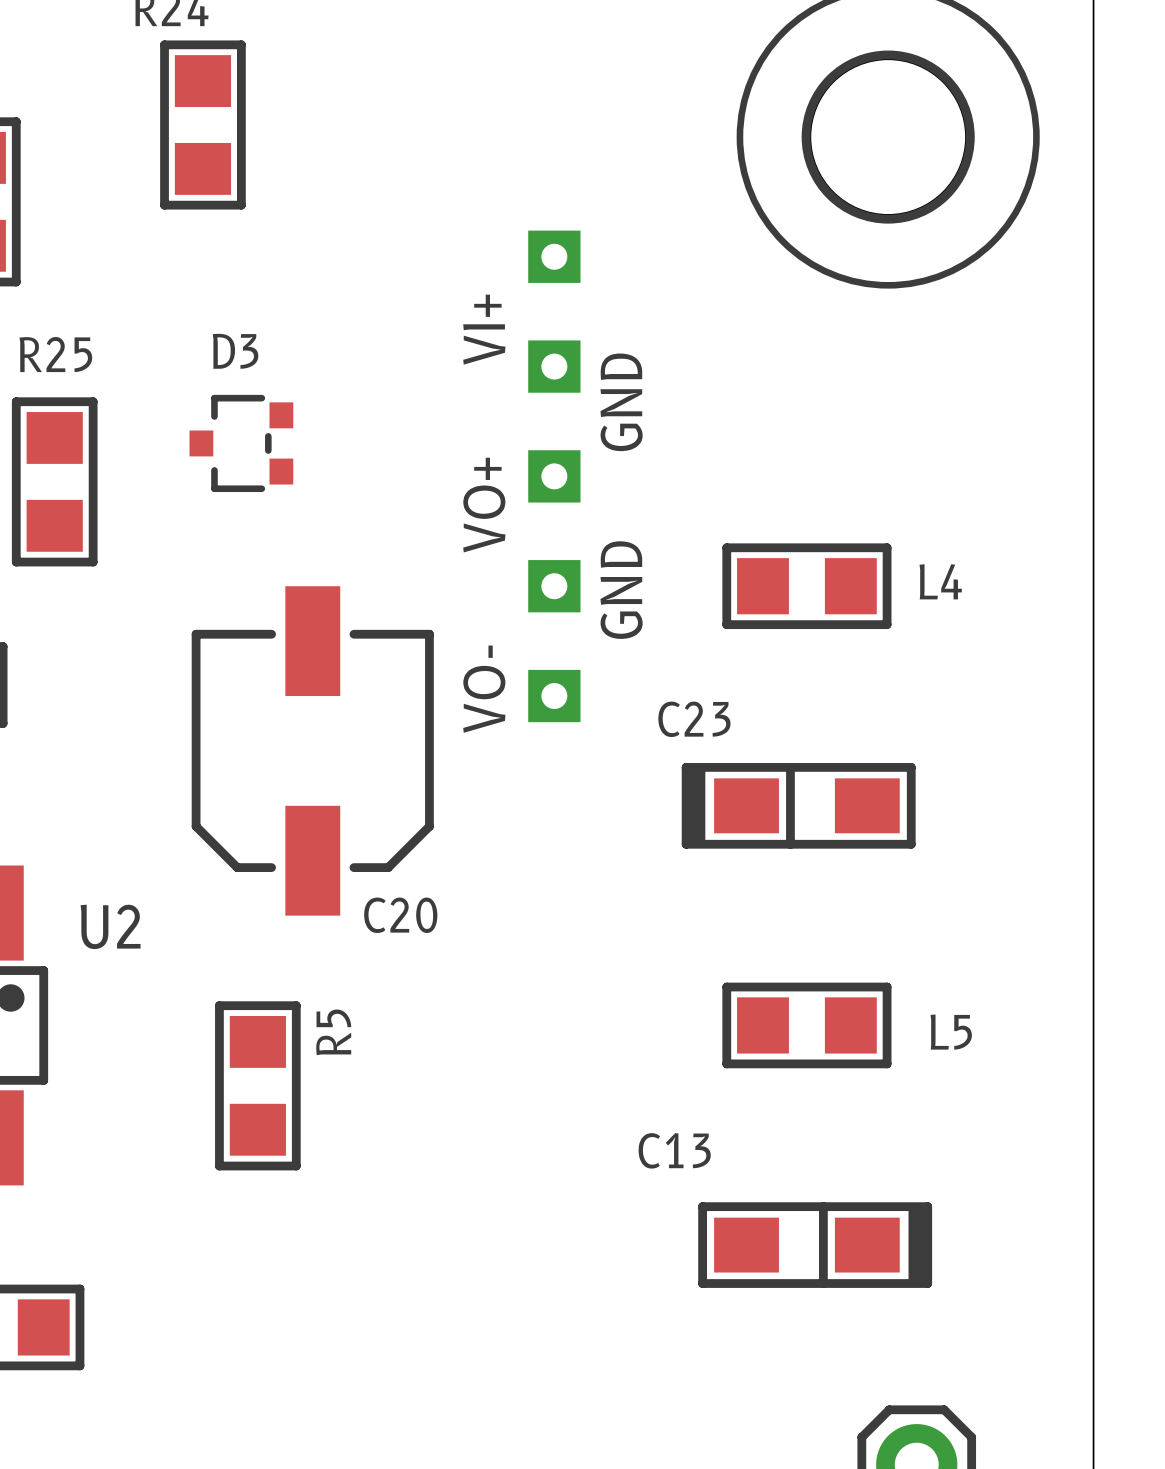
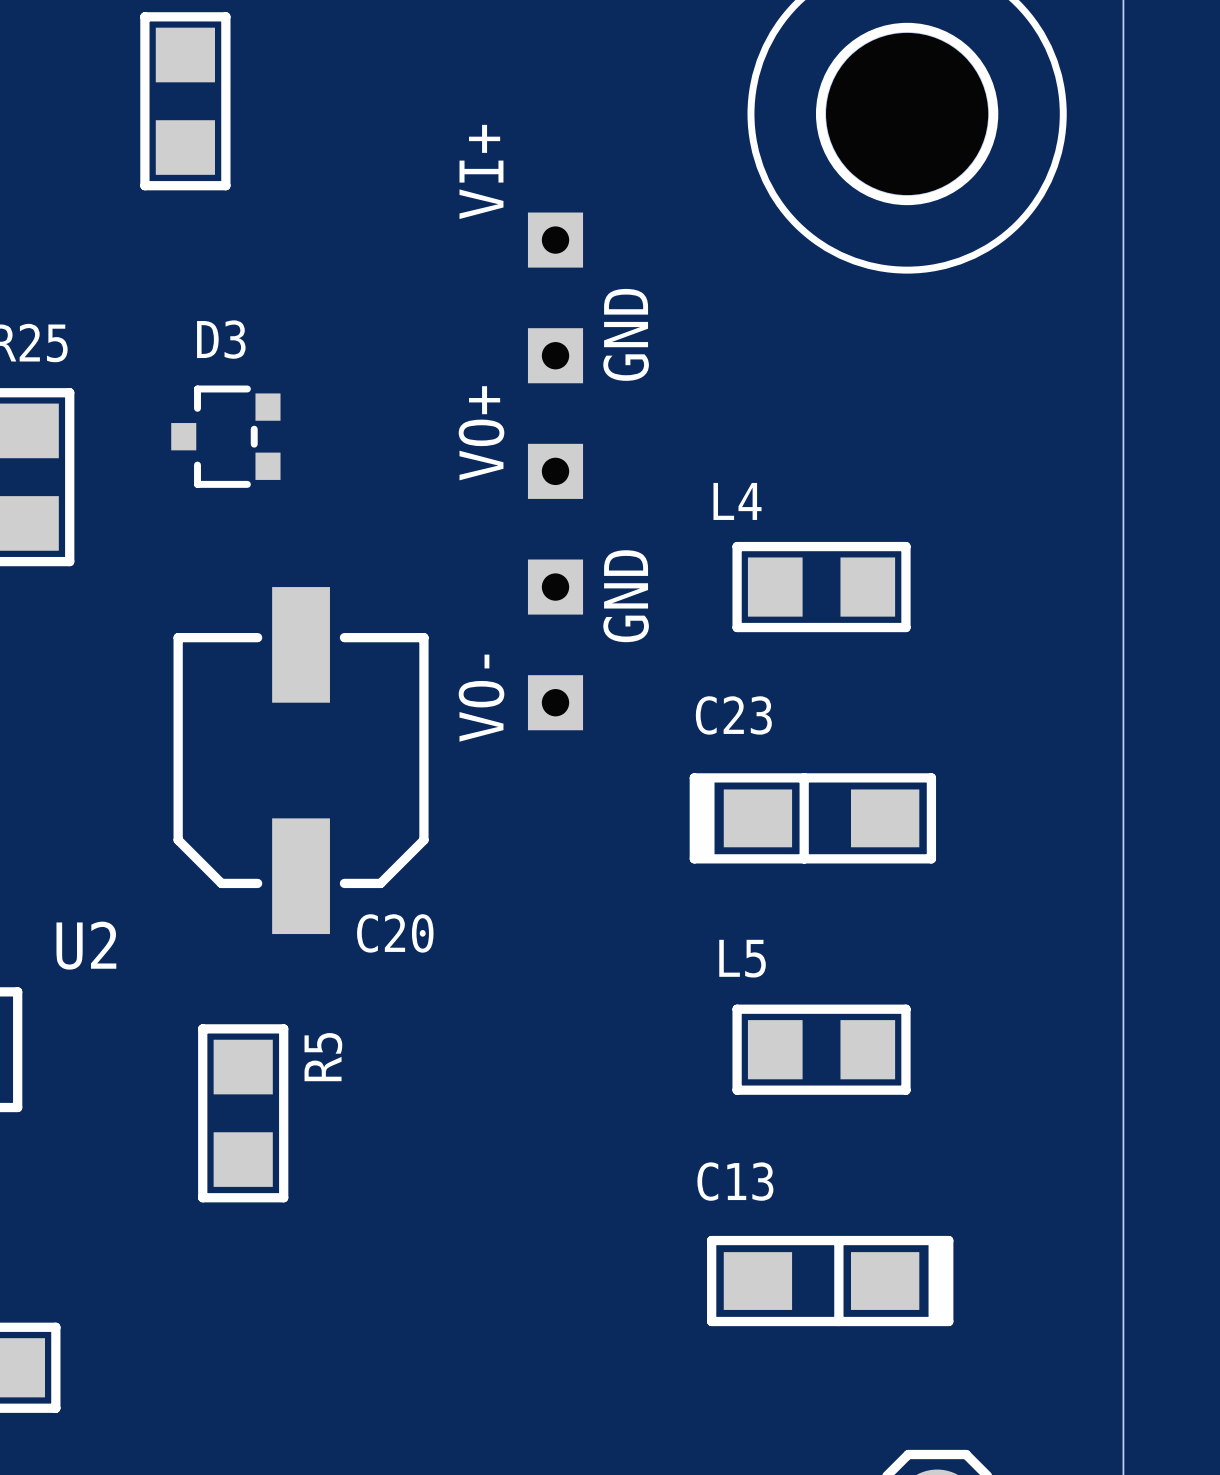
L4 name position: L4 (940, 581) -> L4 (737, 501)
C23 name position: C23 (694, 719) -> C23 (733, 715)
L5 name position: L5 (951, 1032) -> L5 (742, 958)
C13 name position: C13 (674, 1150) -> C13 (735, 1181)

